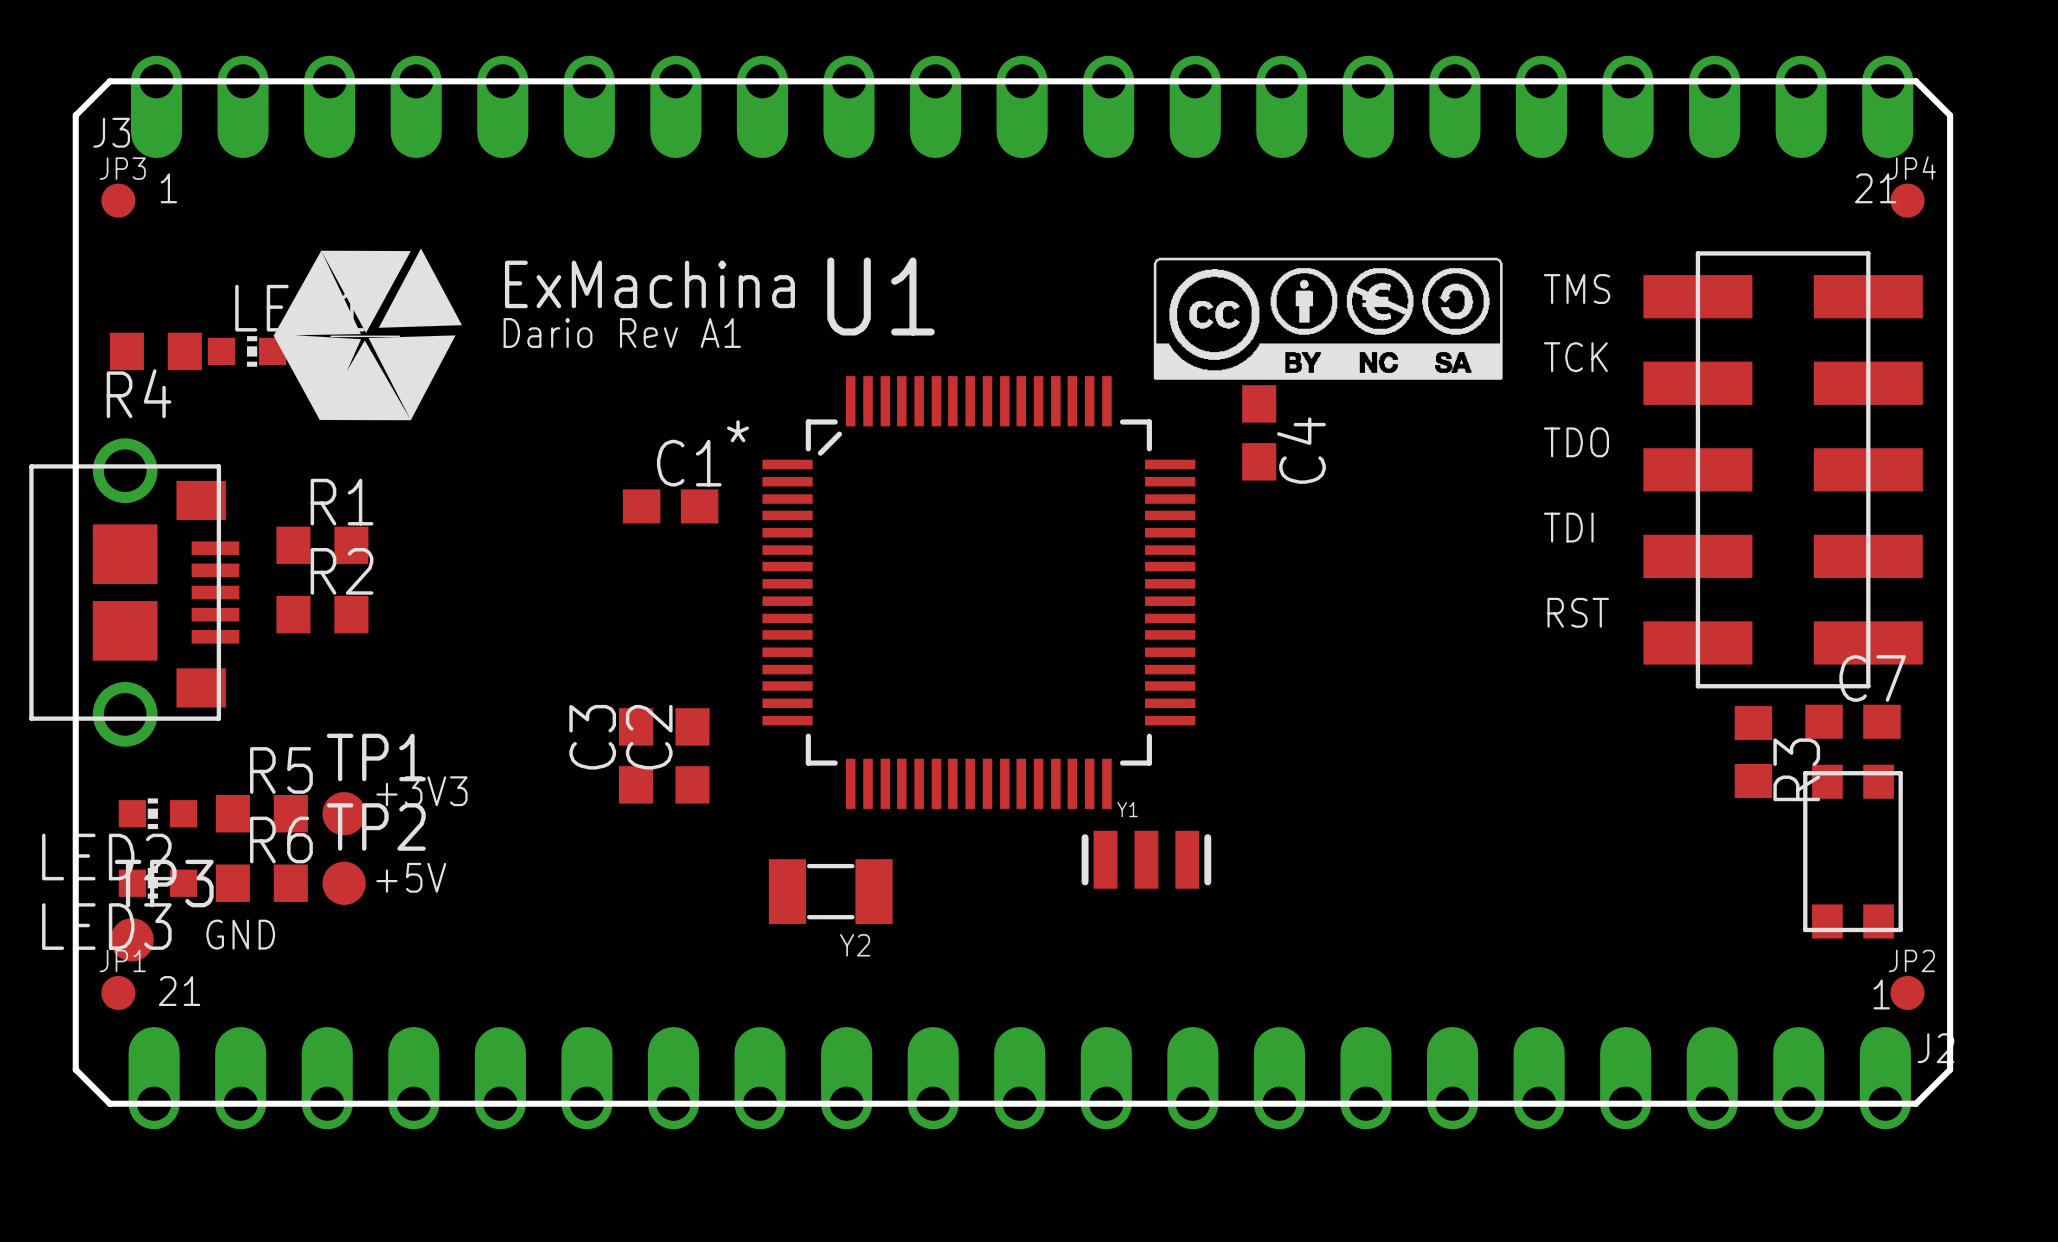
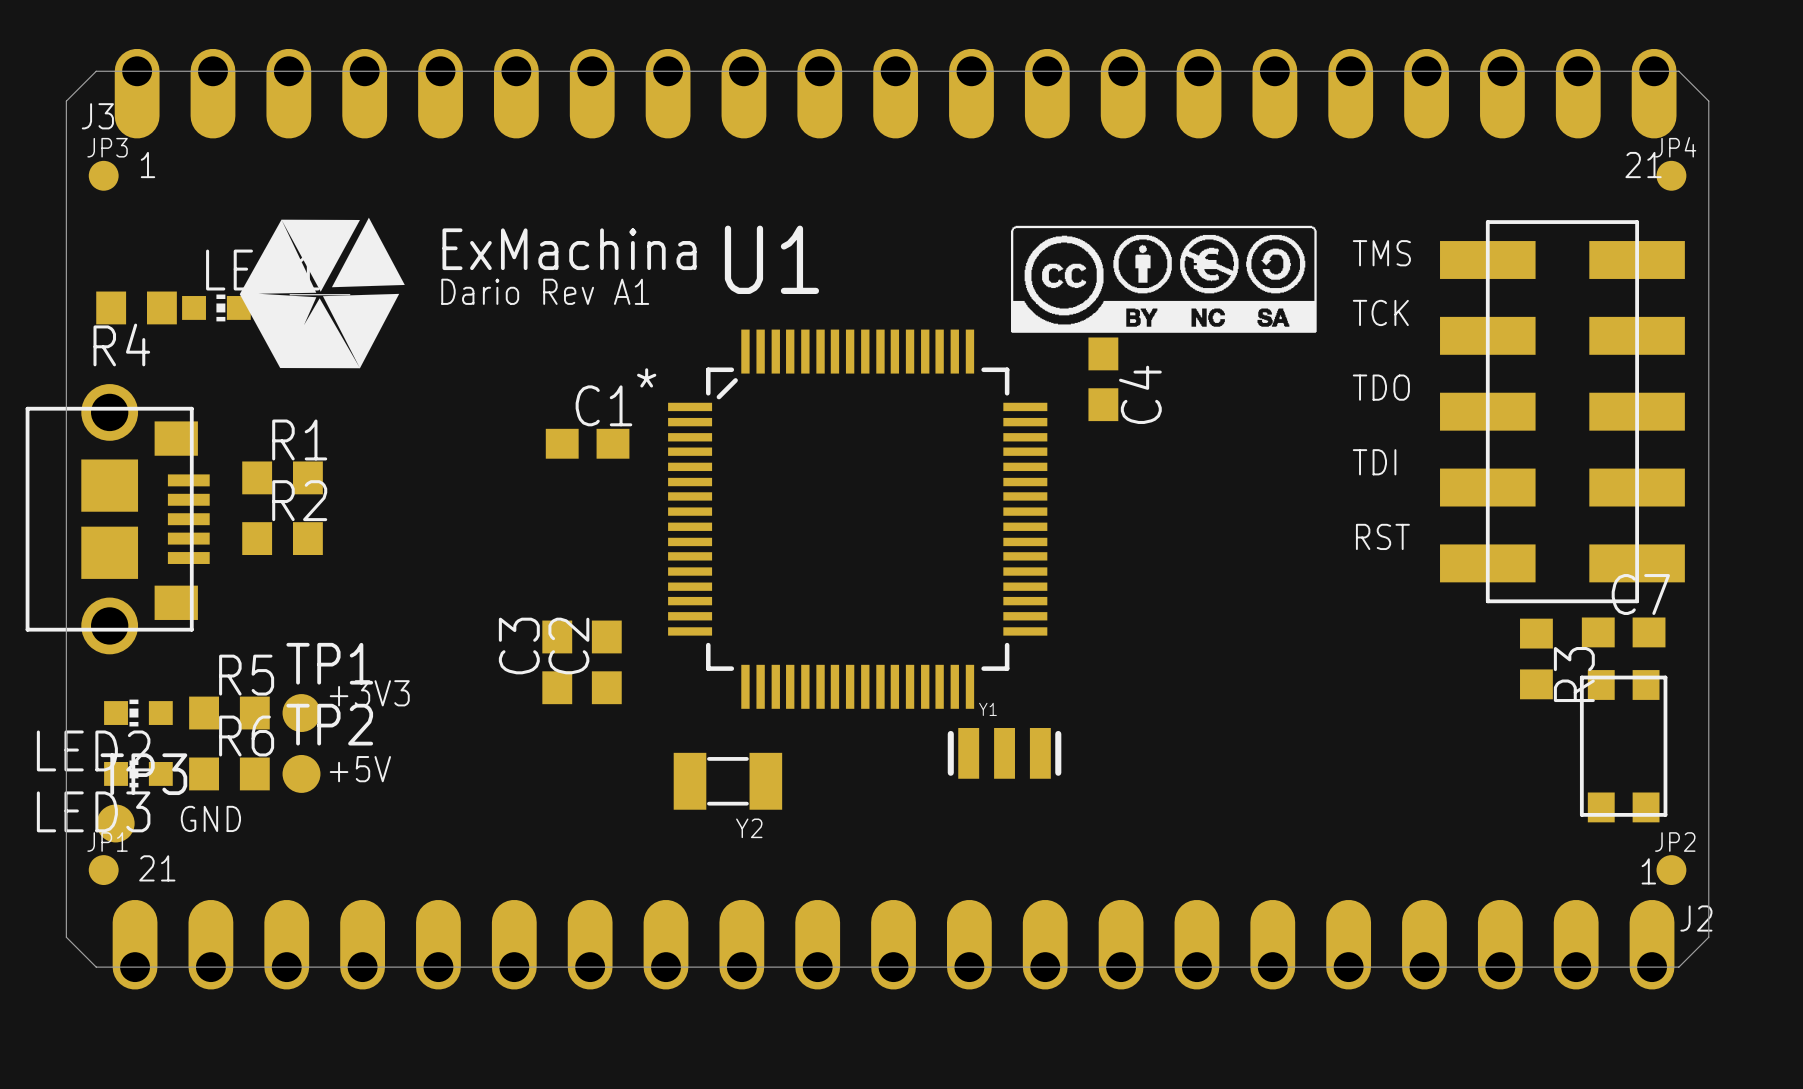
board edge width: thick (109, 81) (1916, 81) (1950, 115) (1950, 1069) (1916, 1103) (109, 1103) (75, 1069) (75, 115) (109, 81) -> thin (96, 71) (1678, 71) (1708, 101) (1708, 937) (1678, 967) (96, 967) (66, 937) (66, 101) (96, 71)

